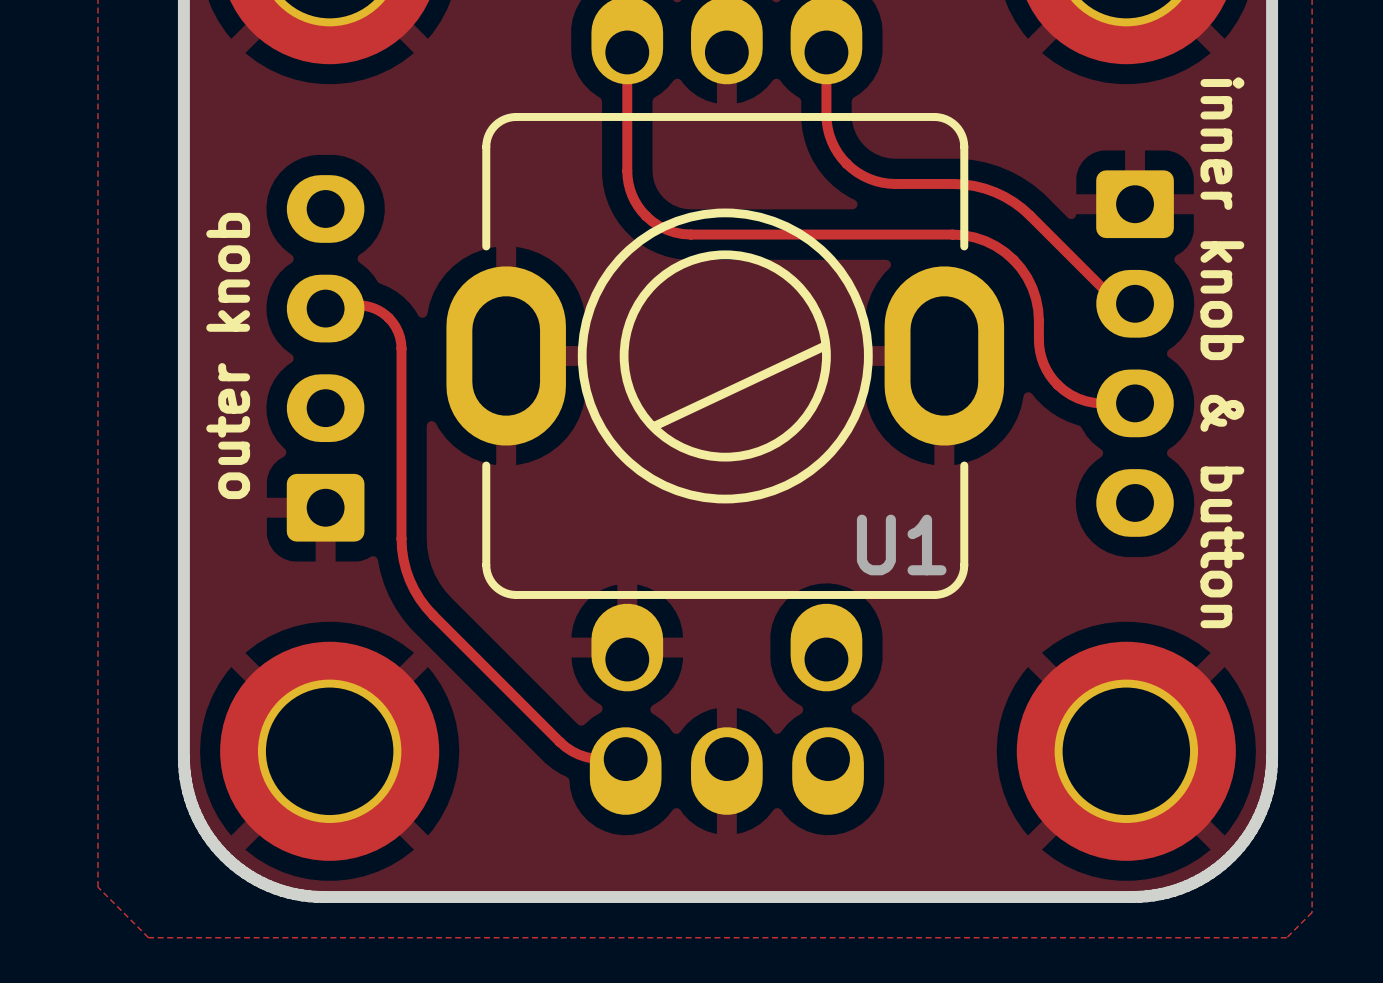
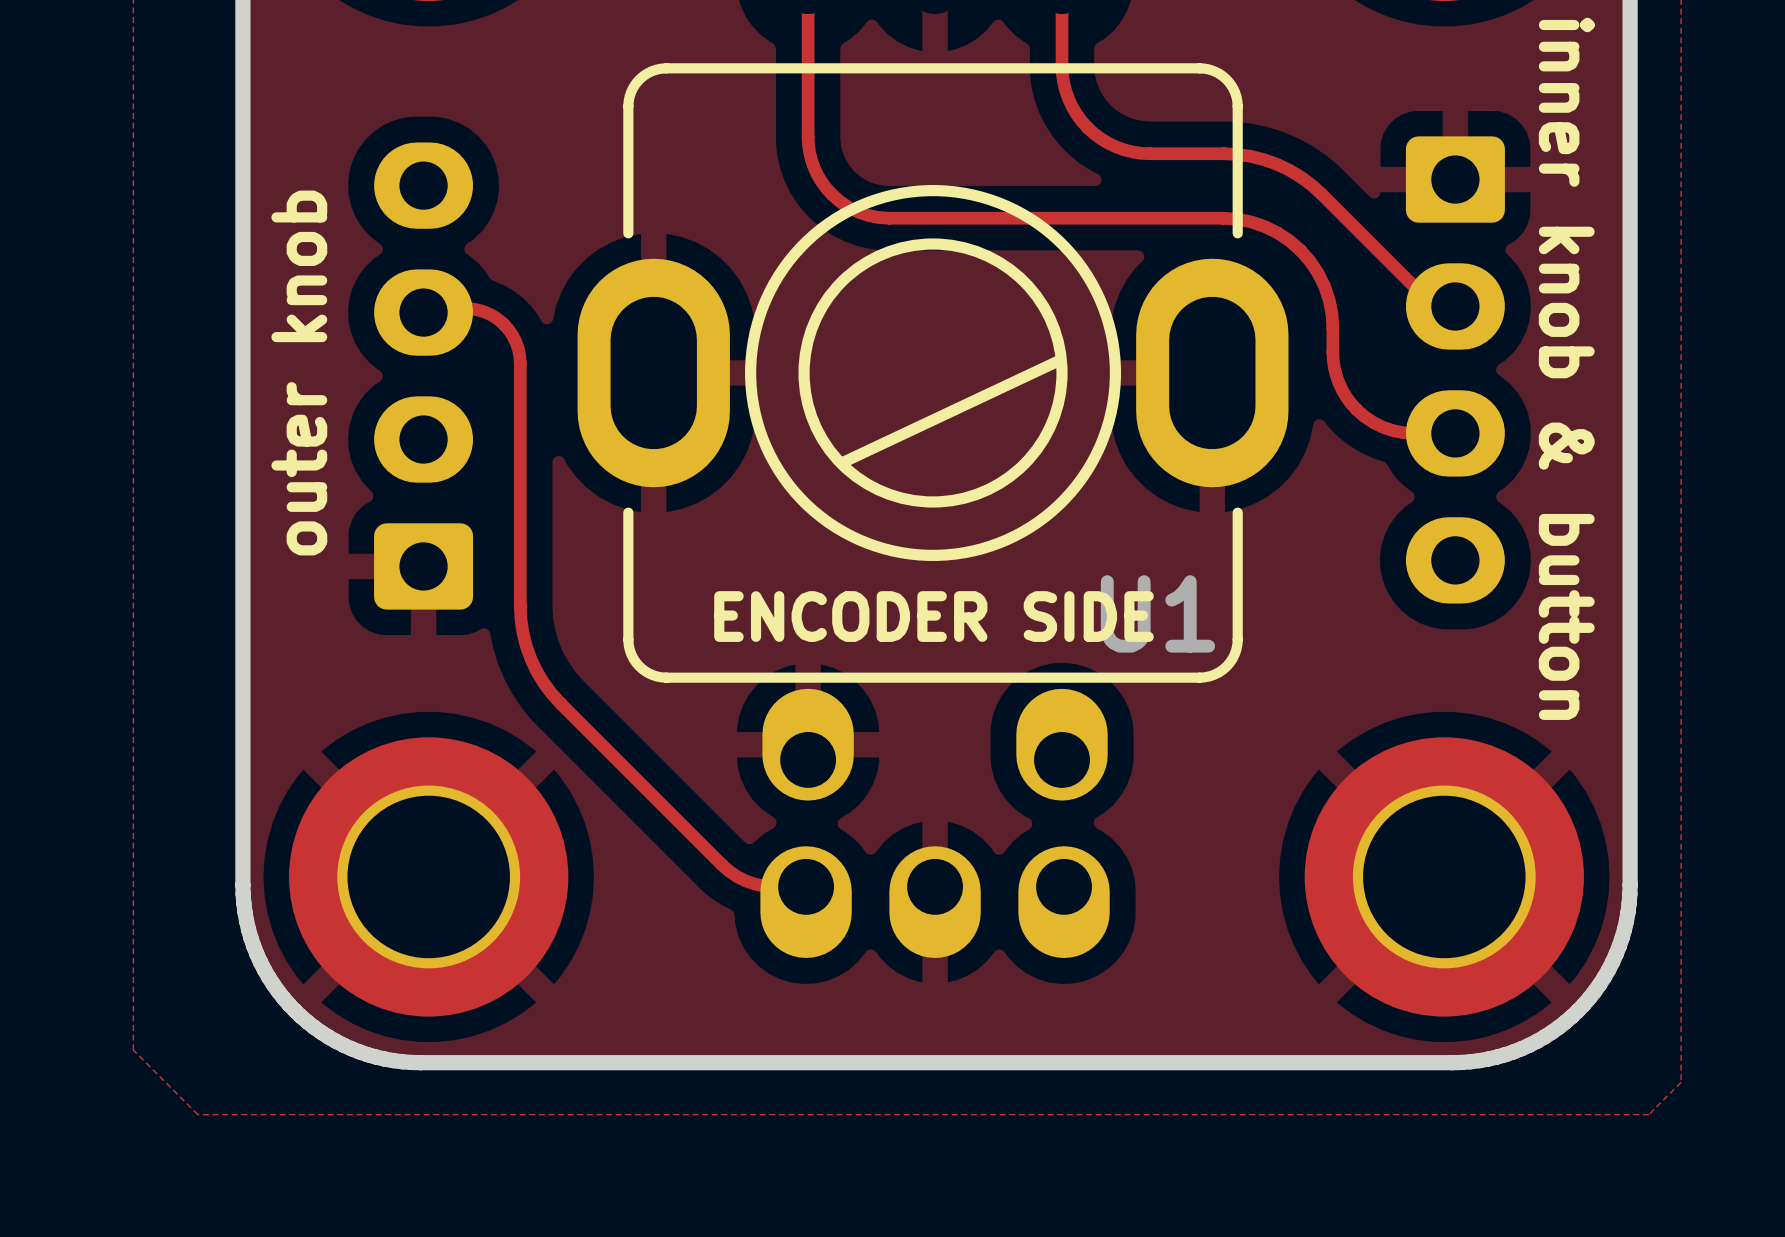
text: none -> ENCODER SIDE (934, 616)

